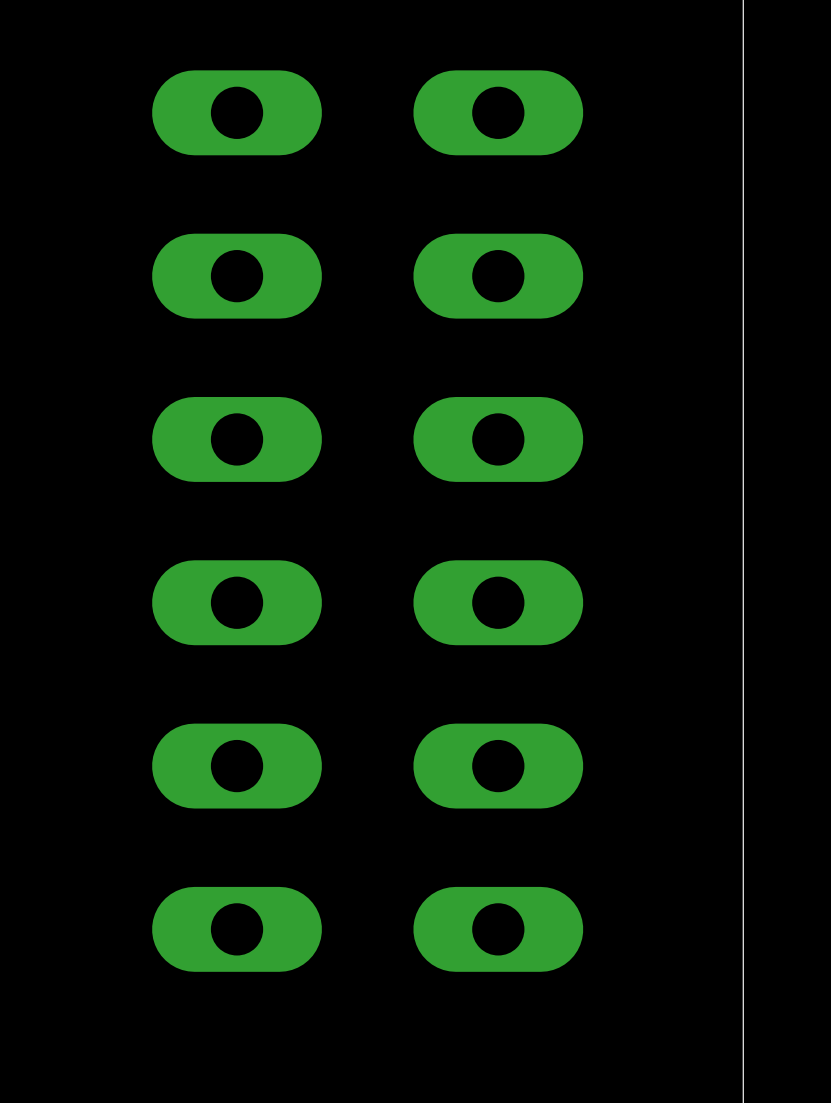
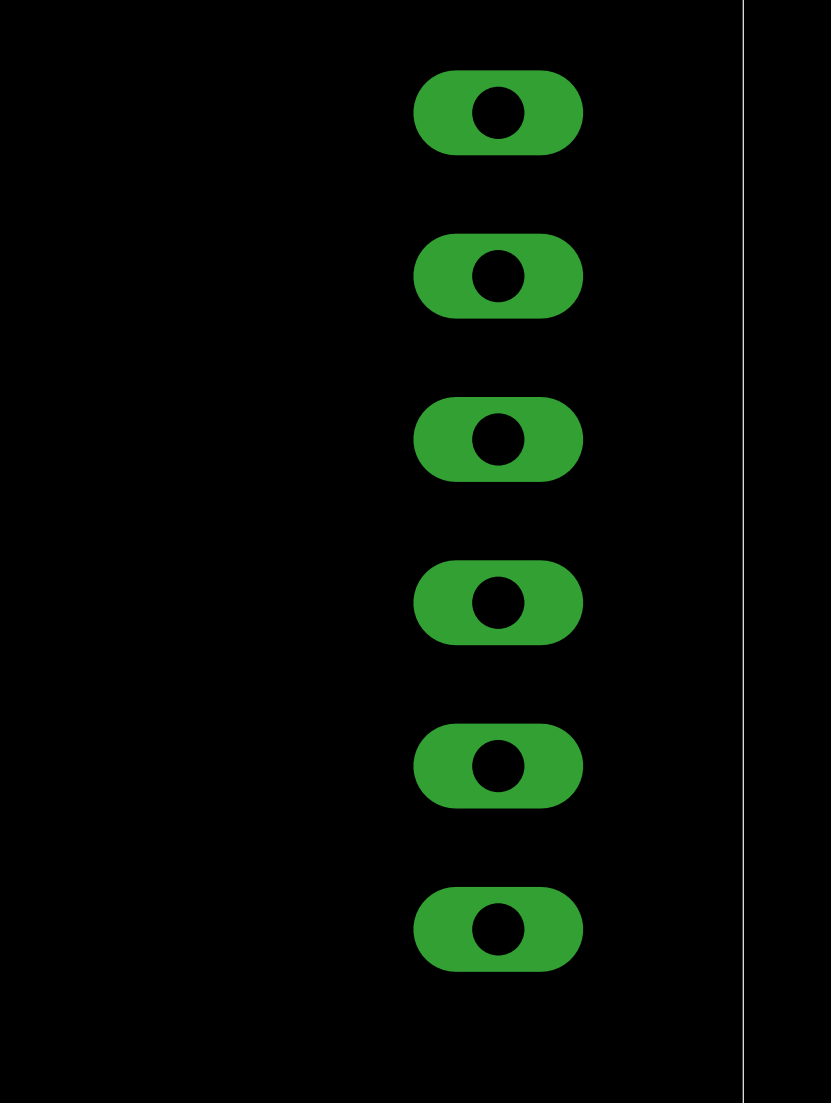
part: (237, 521) -> none

